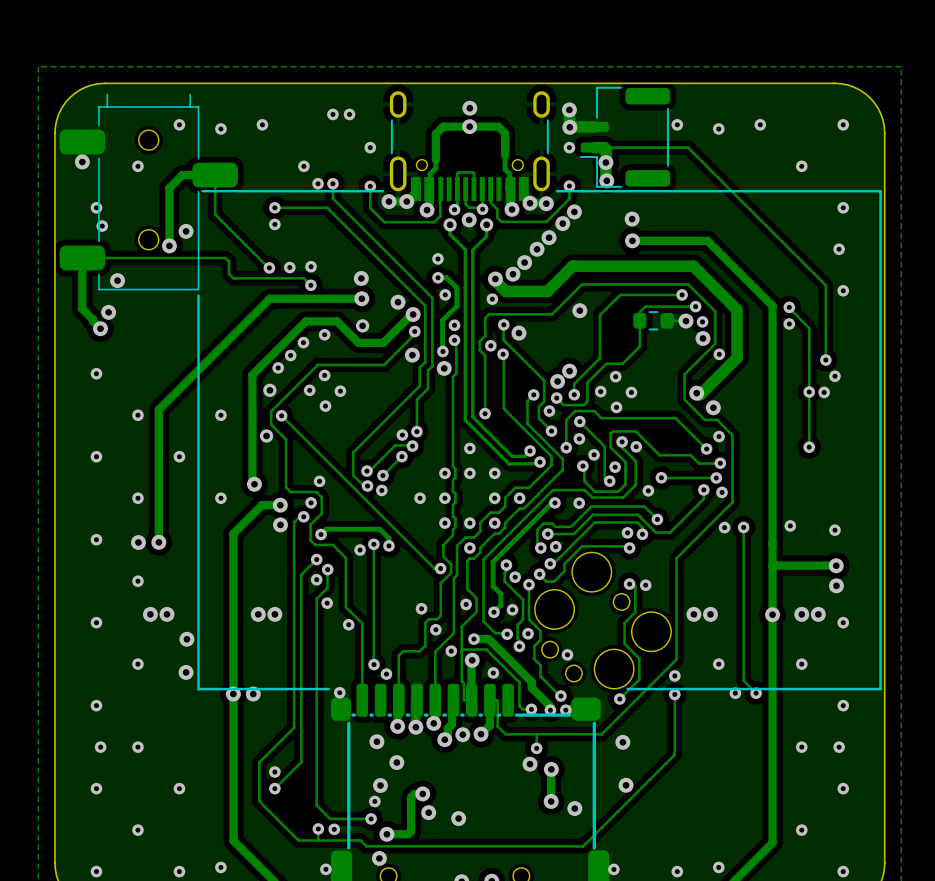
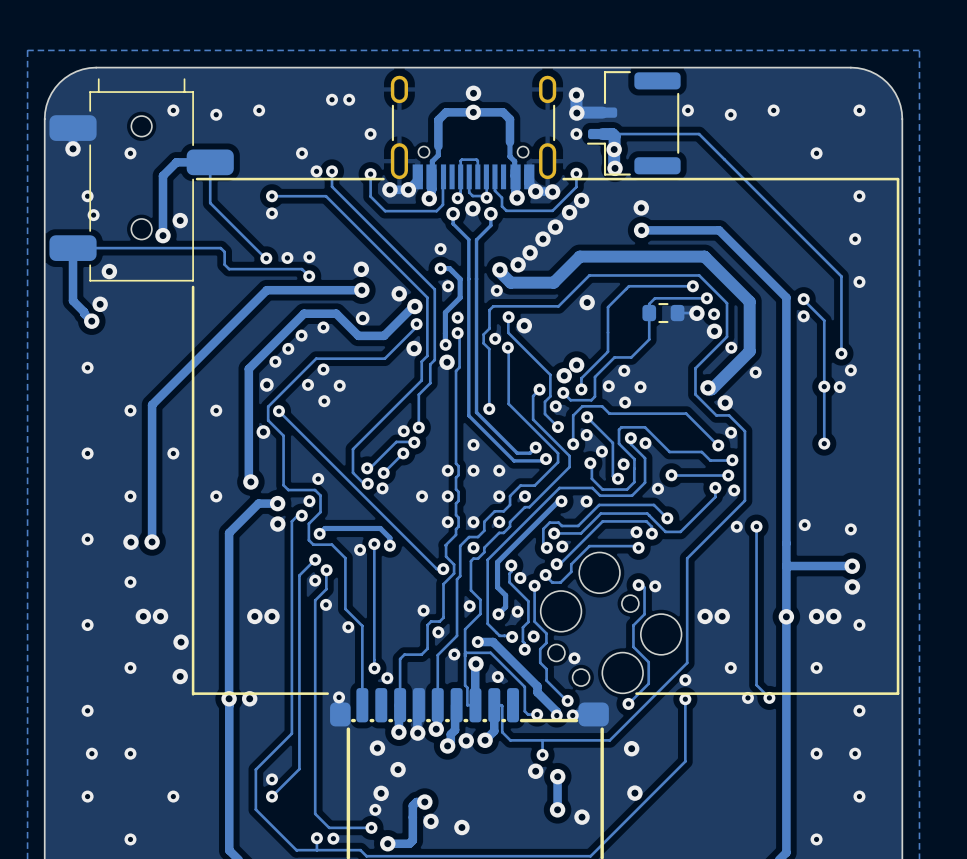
via: none -> (755, 372)

